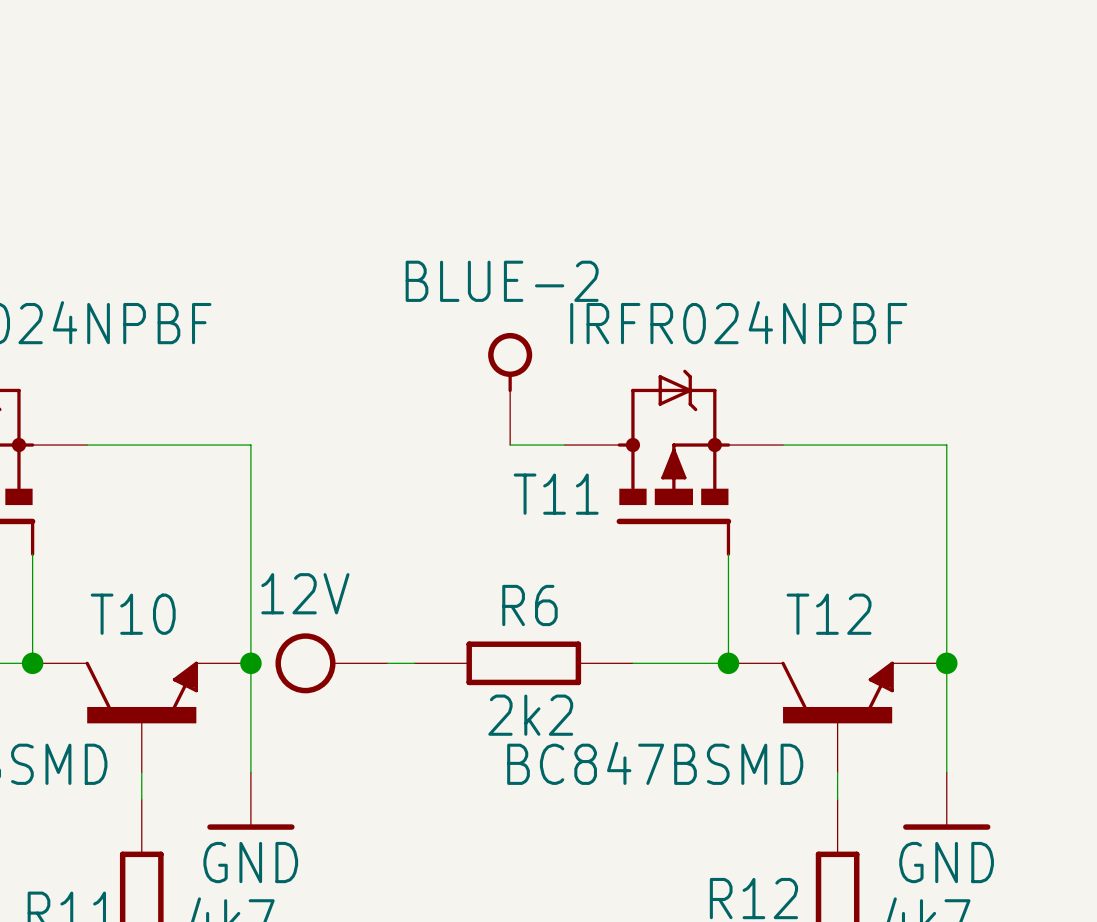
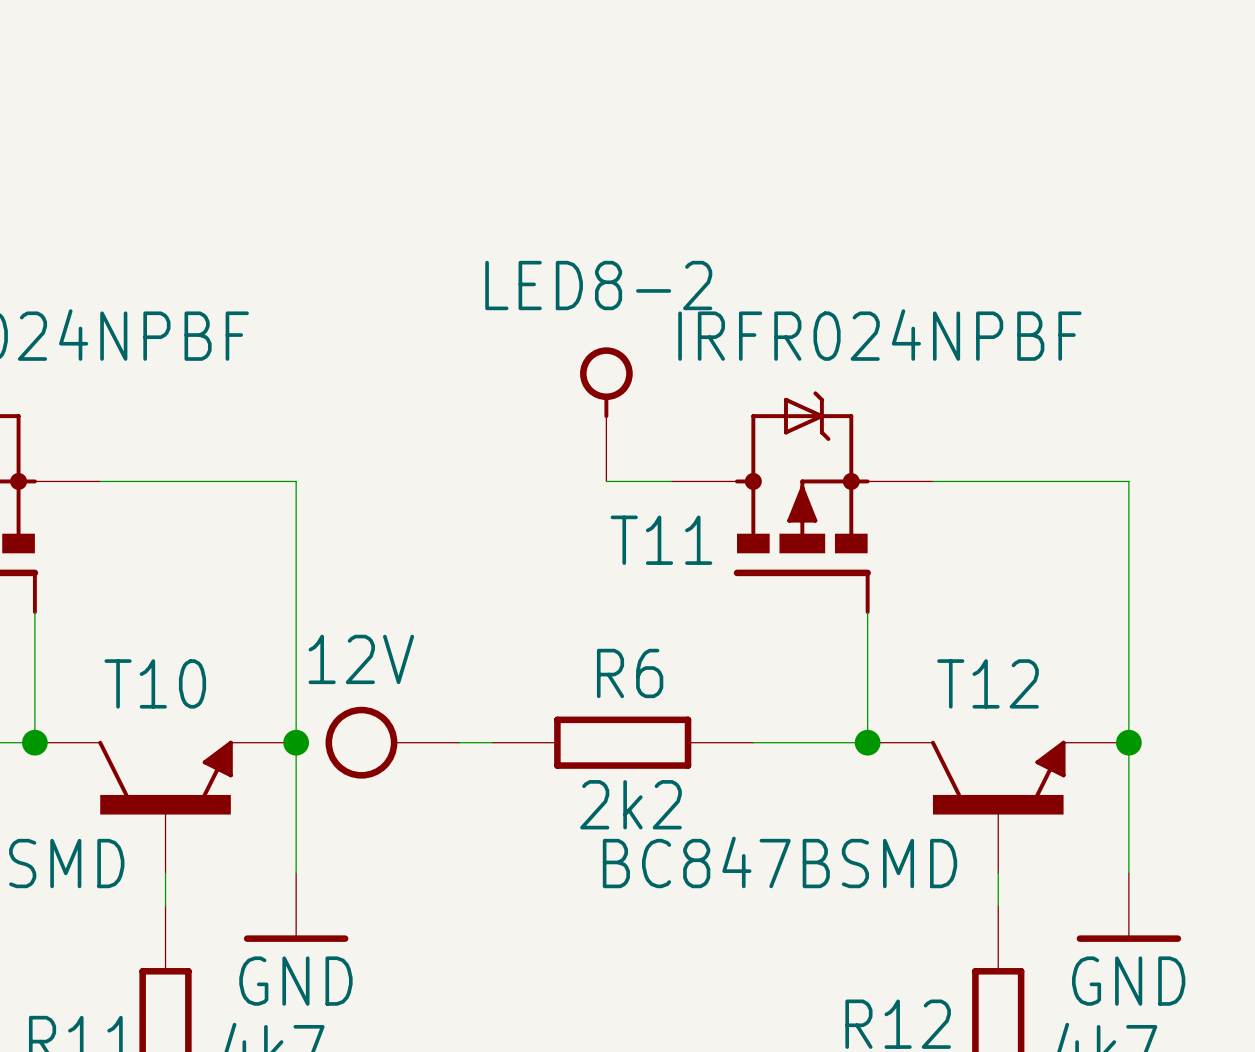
BLUE-2 name: BLUE-2 (502, 281) -> LED8-2 (598, 285)

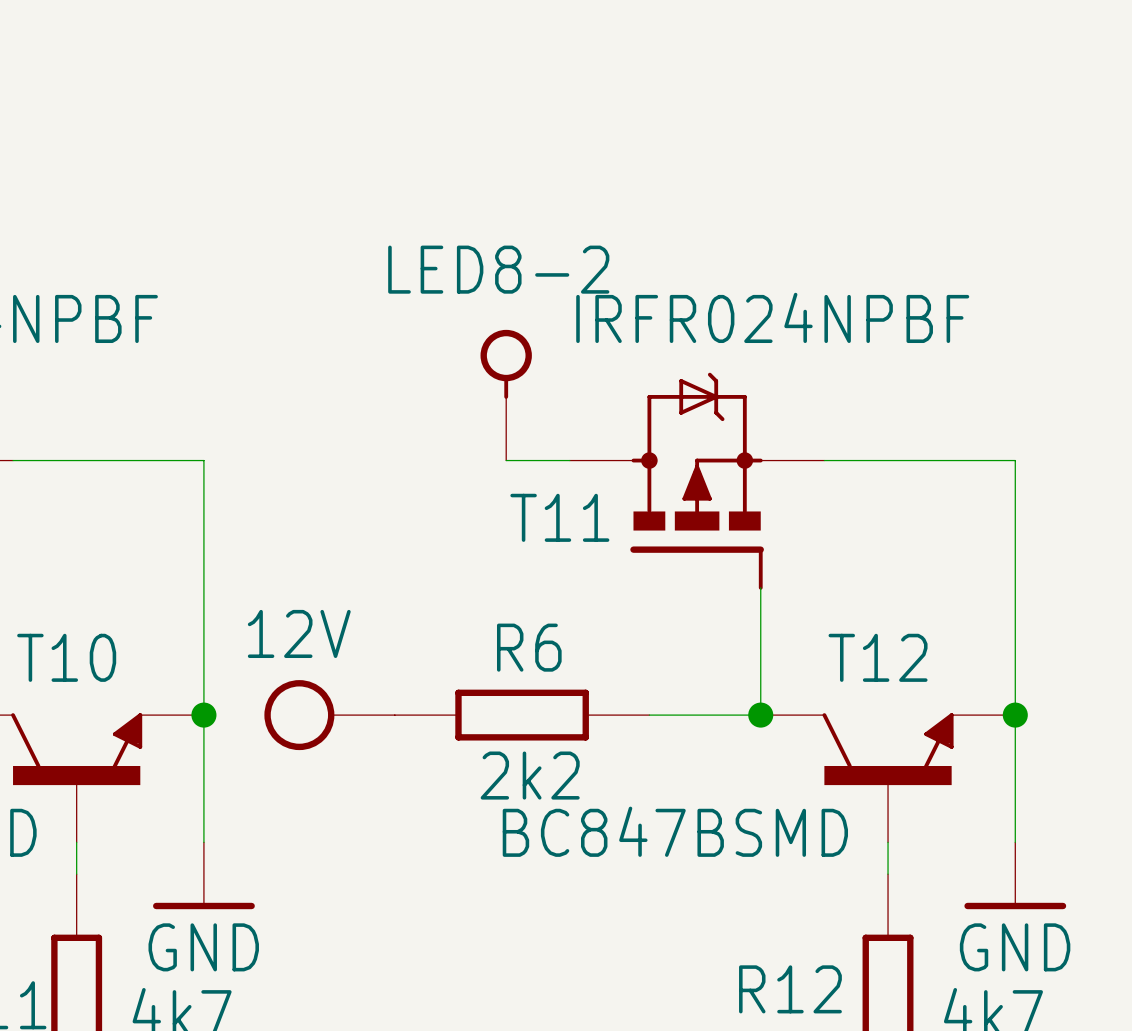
power symbol position: 12V (392, 742) -> 12V (329, 715)

